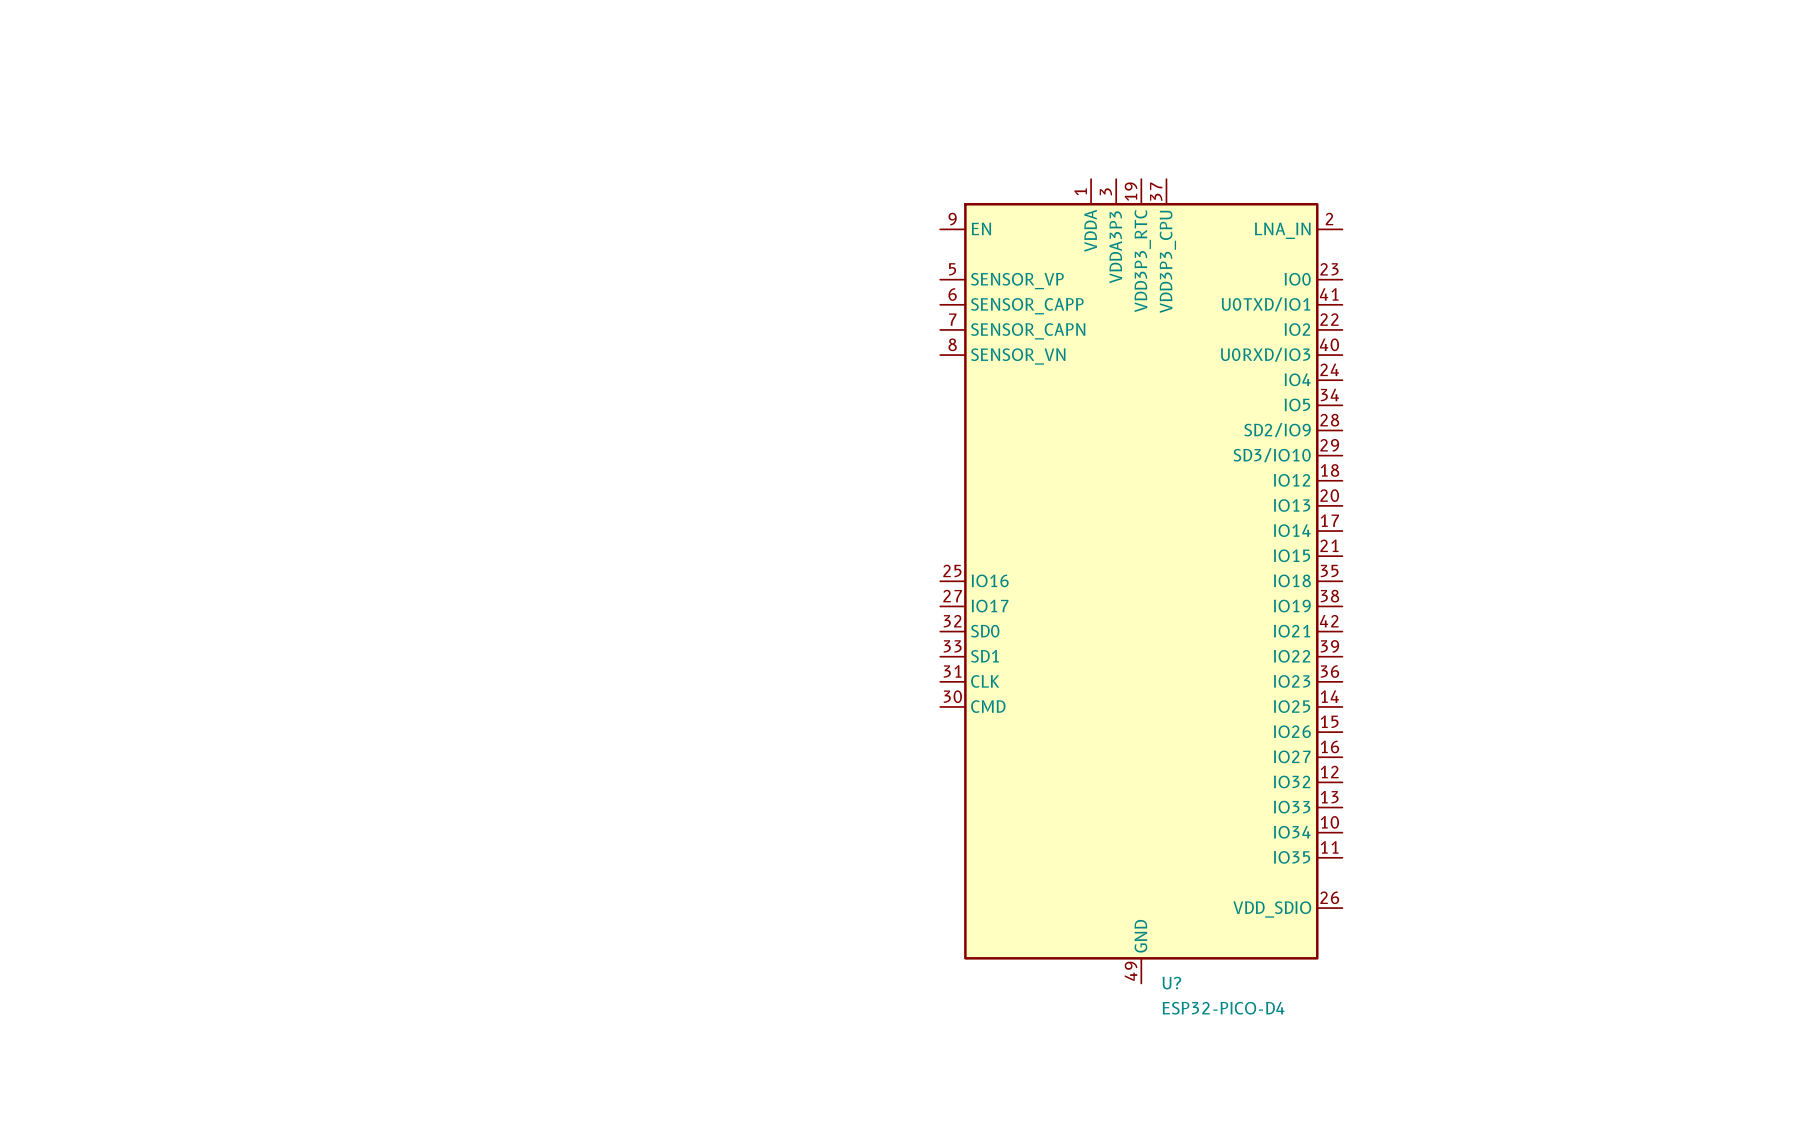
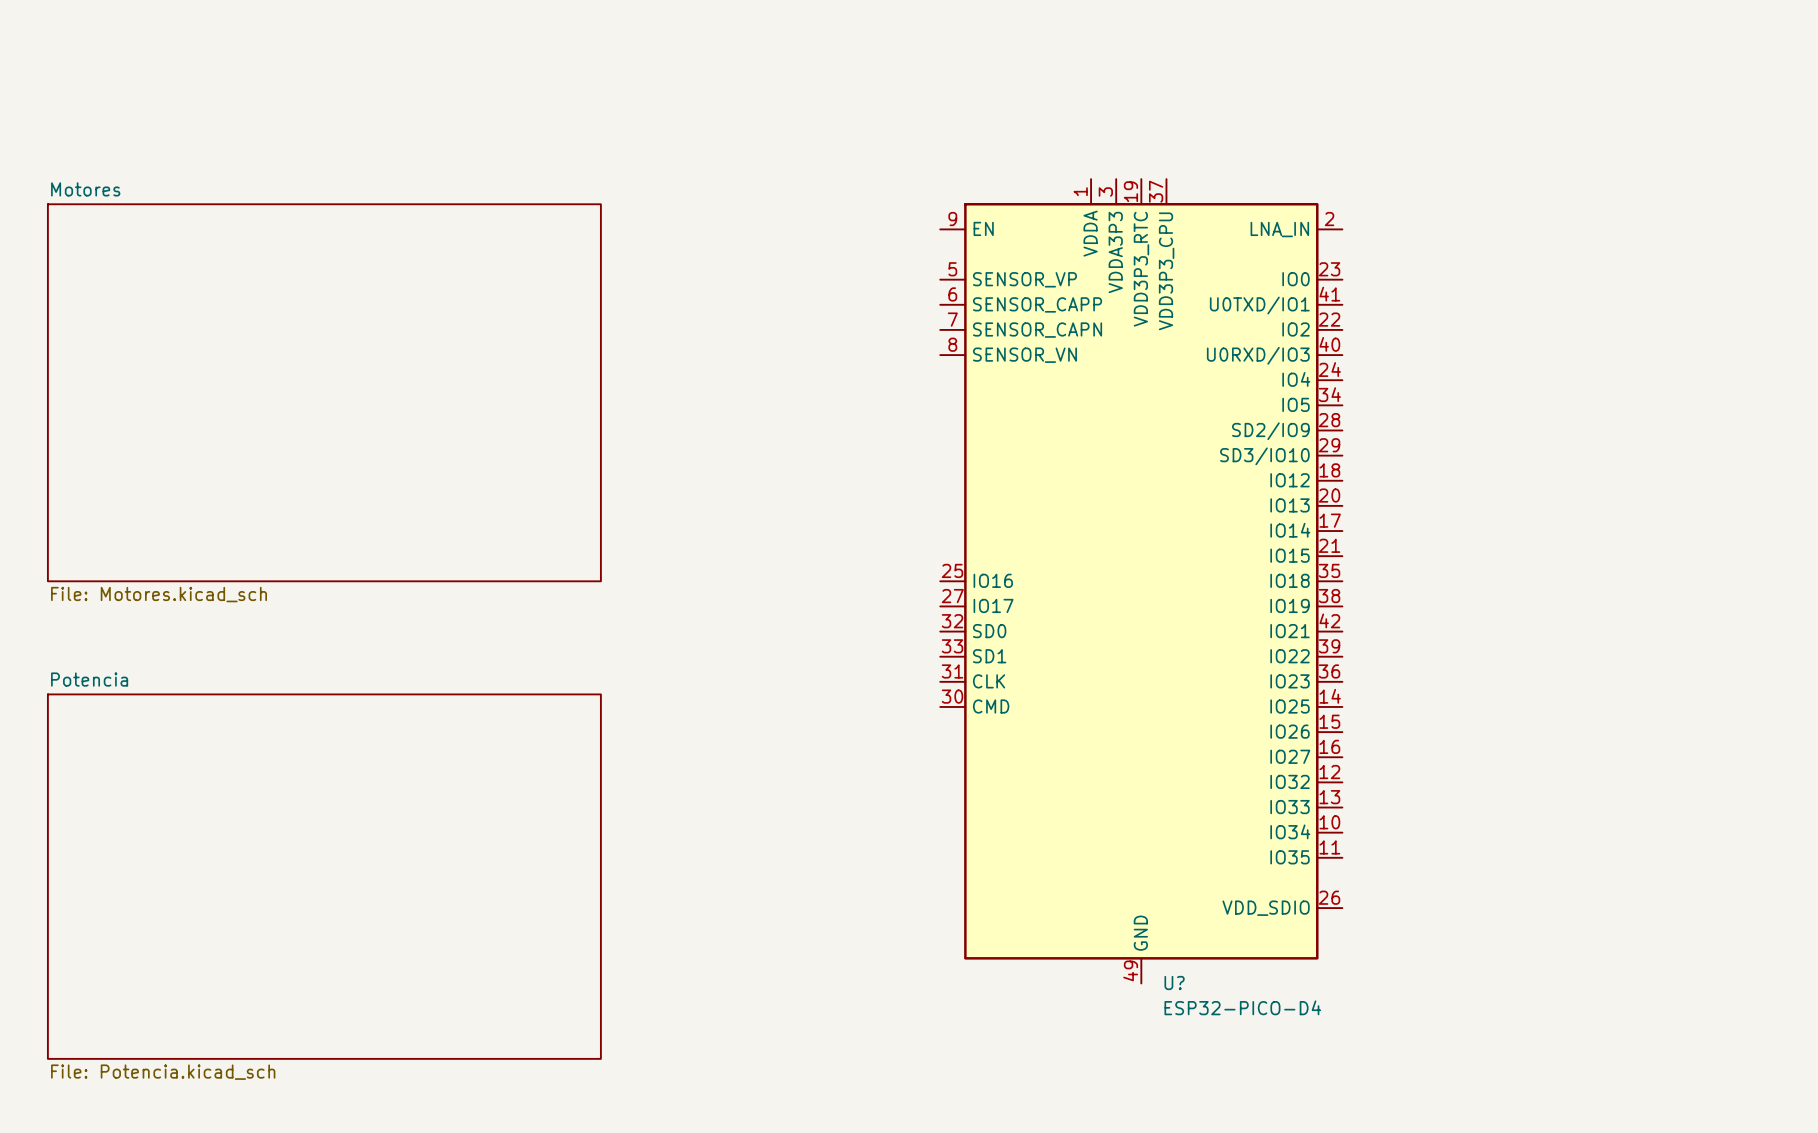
sheet Motores: none -> File: Motores.kicad_sch (324, 392)
sheet Potencia: none -> File: Potencia.kicad_sch (324, 876)

